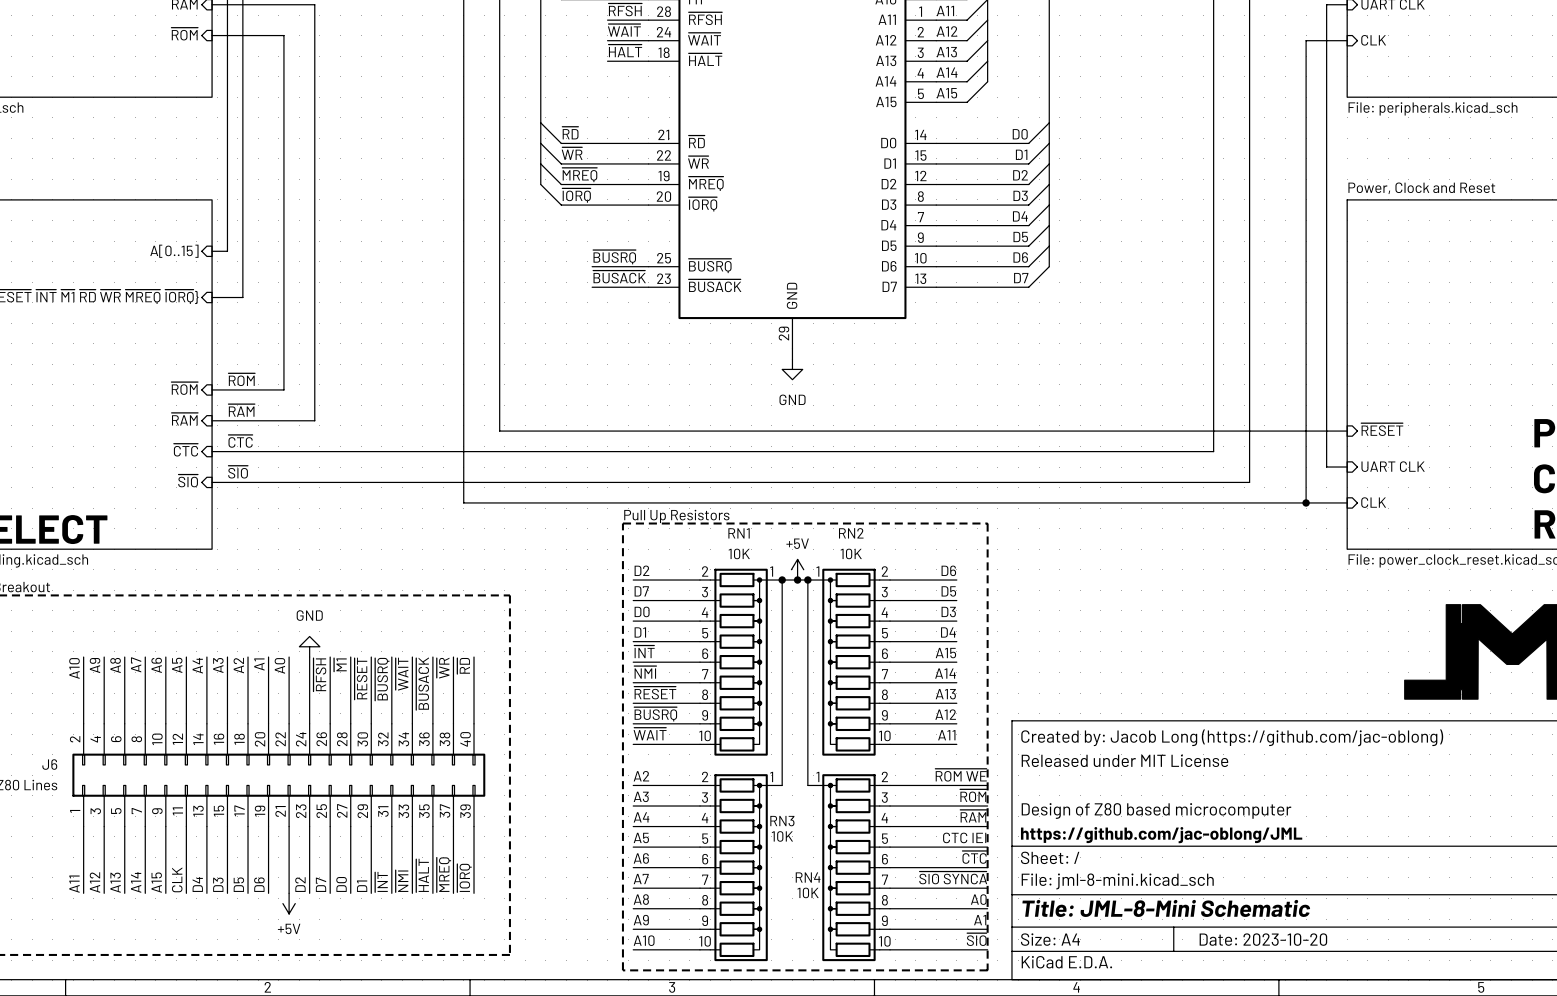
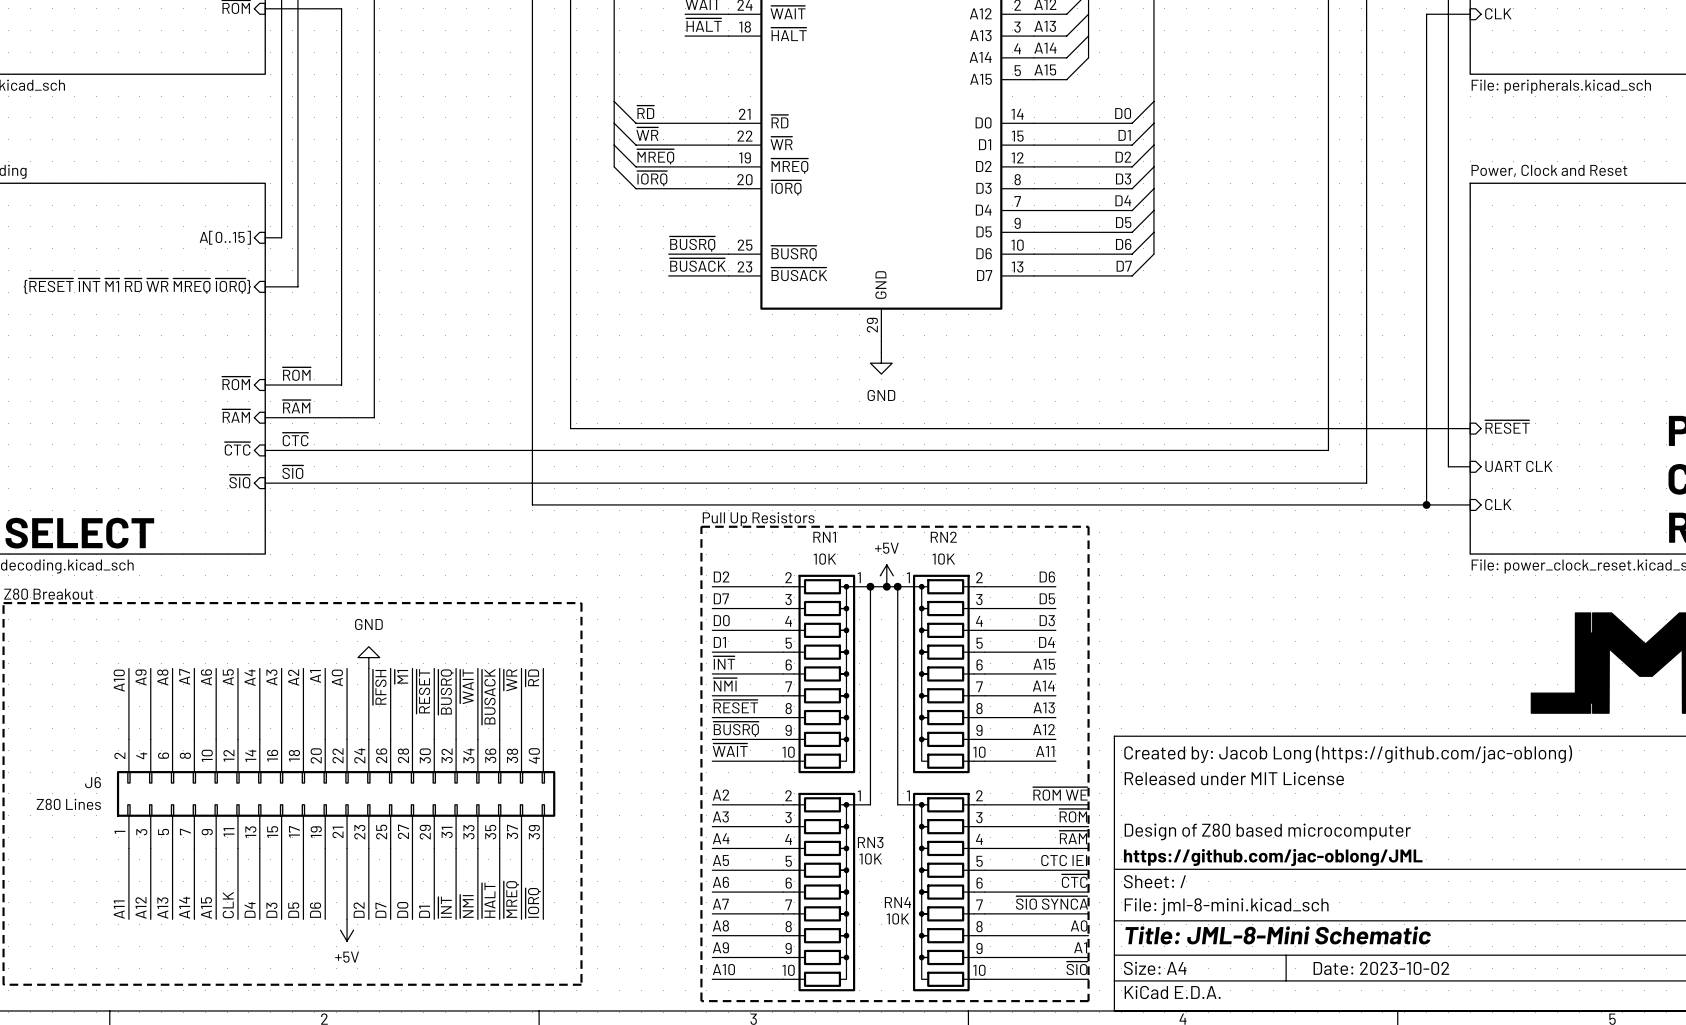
title block: Date: 2023-10-20 (1263, 939) -> Date: 2023-10-02 (1381, 968)

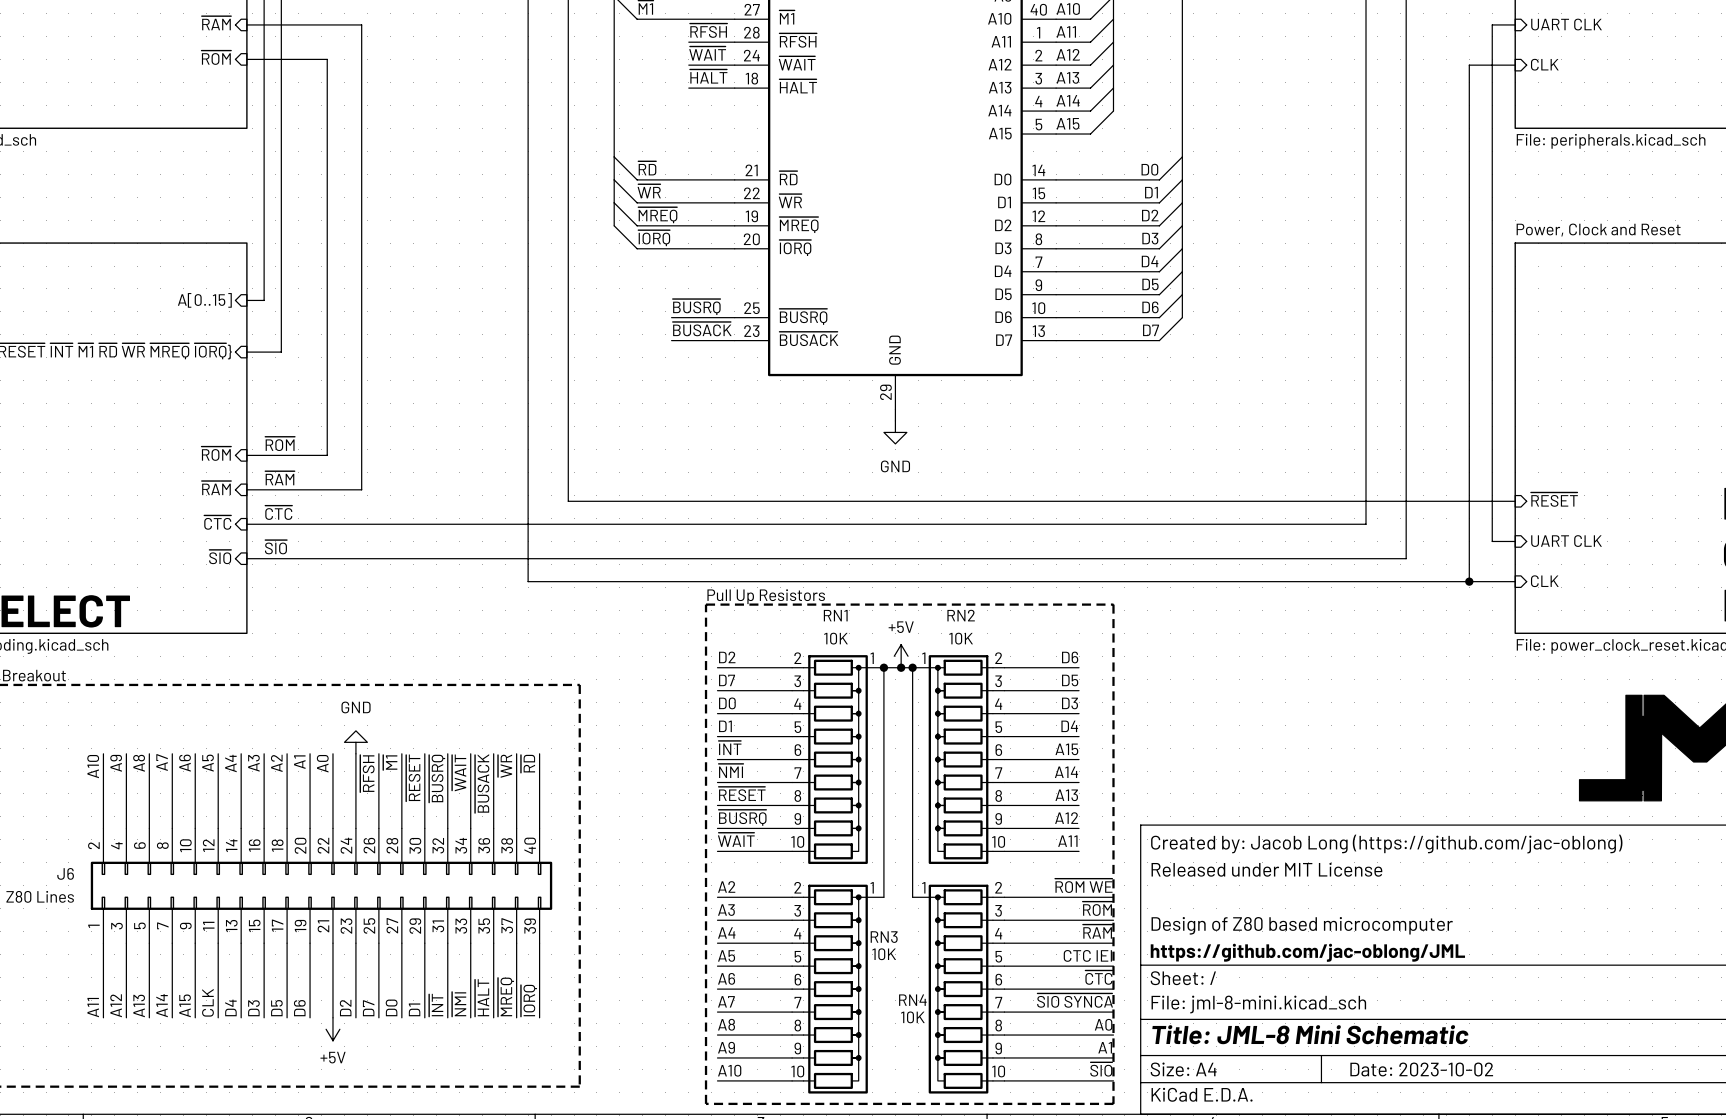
title block: Title: JML-8-Mini Schematic (1278, 935) -> Title: JML-8 Mini Schematic (1310, 1034)

